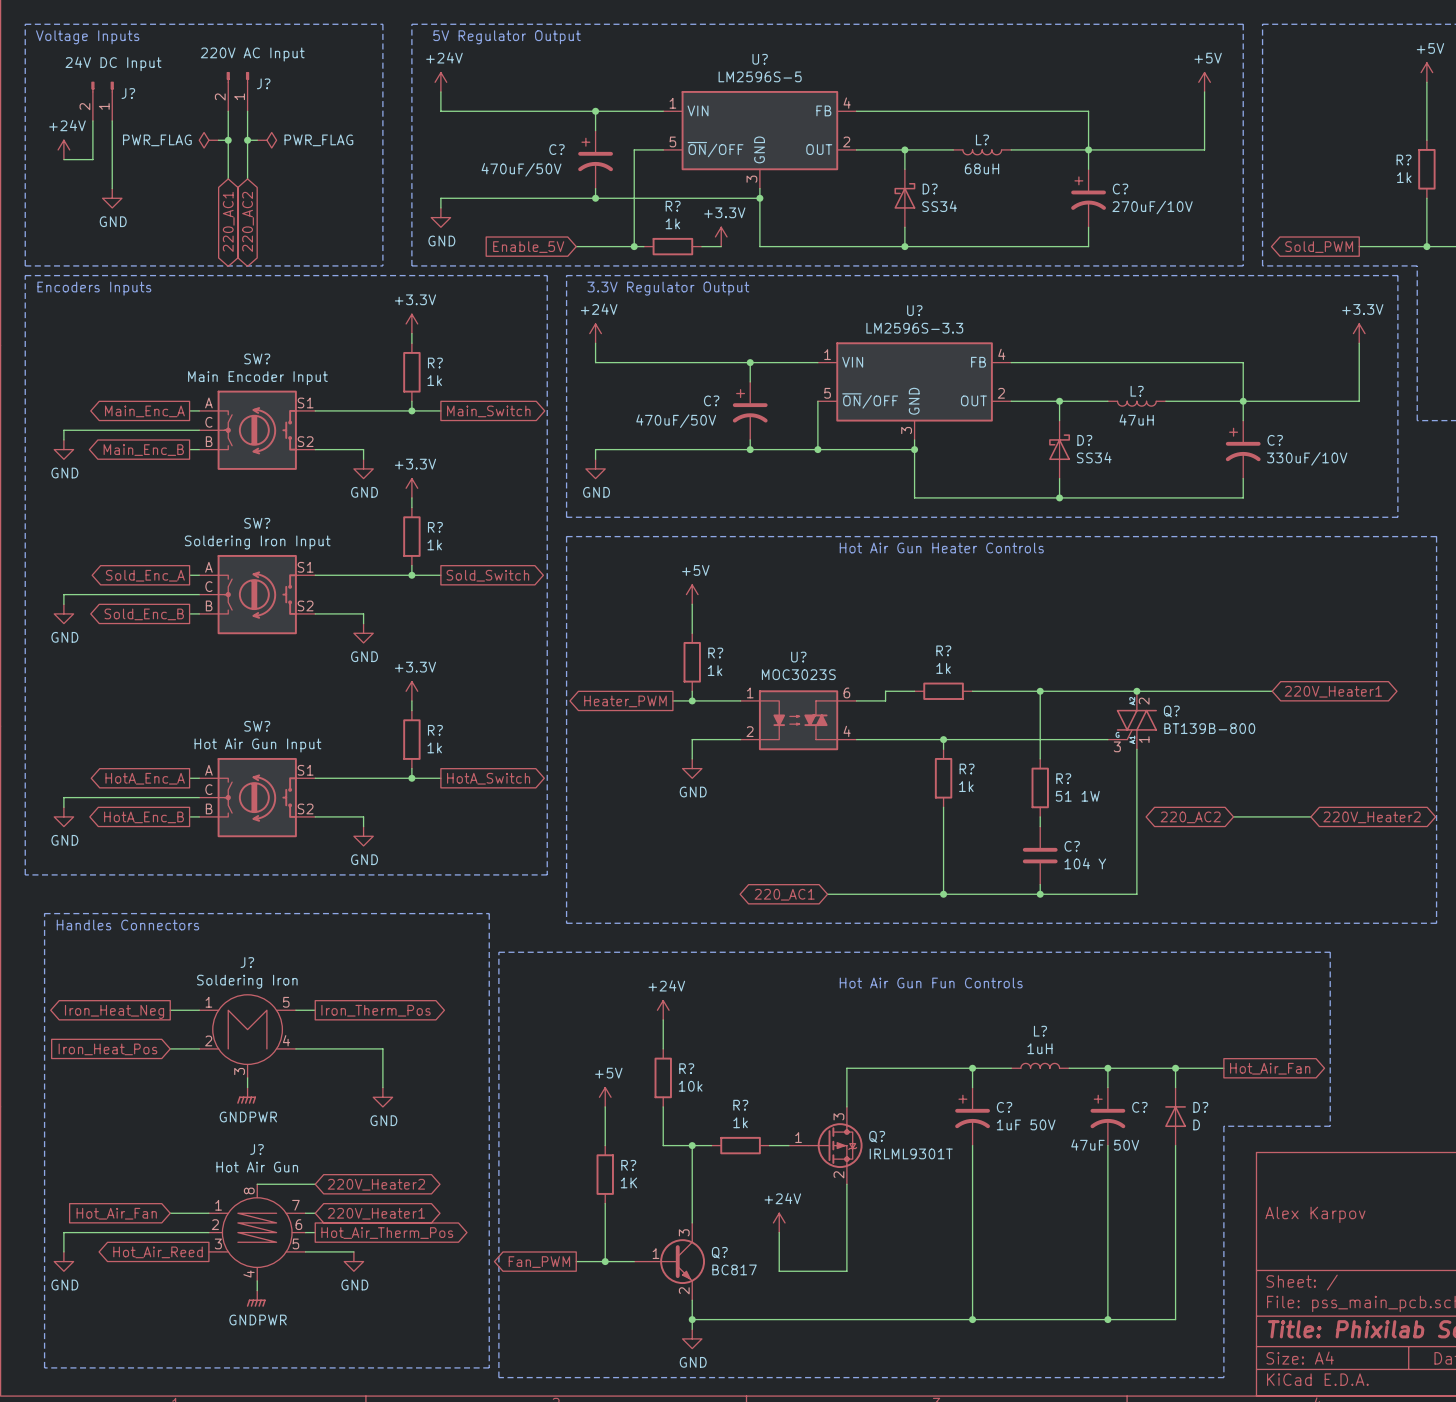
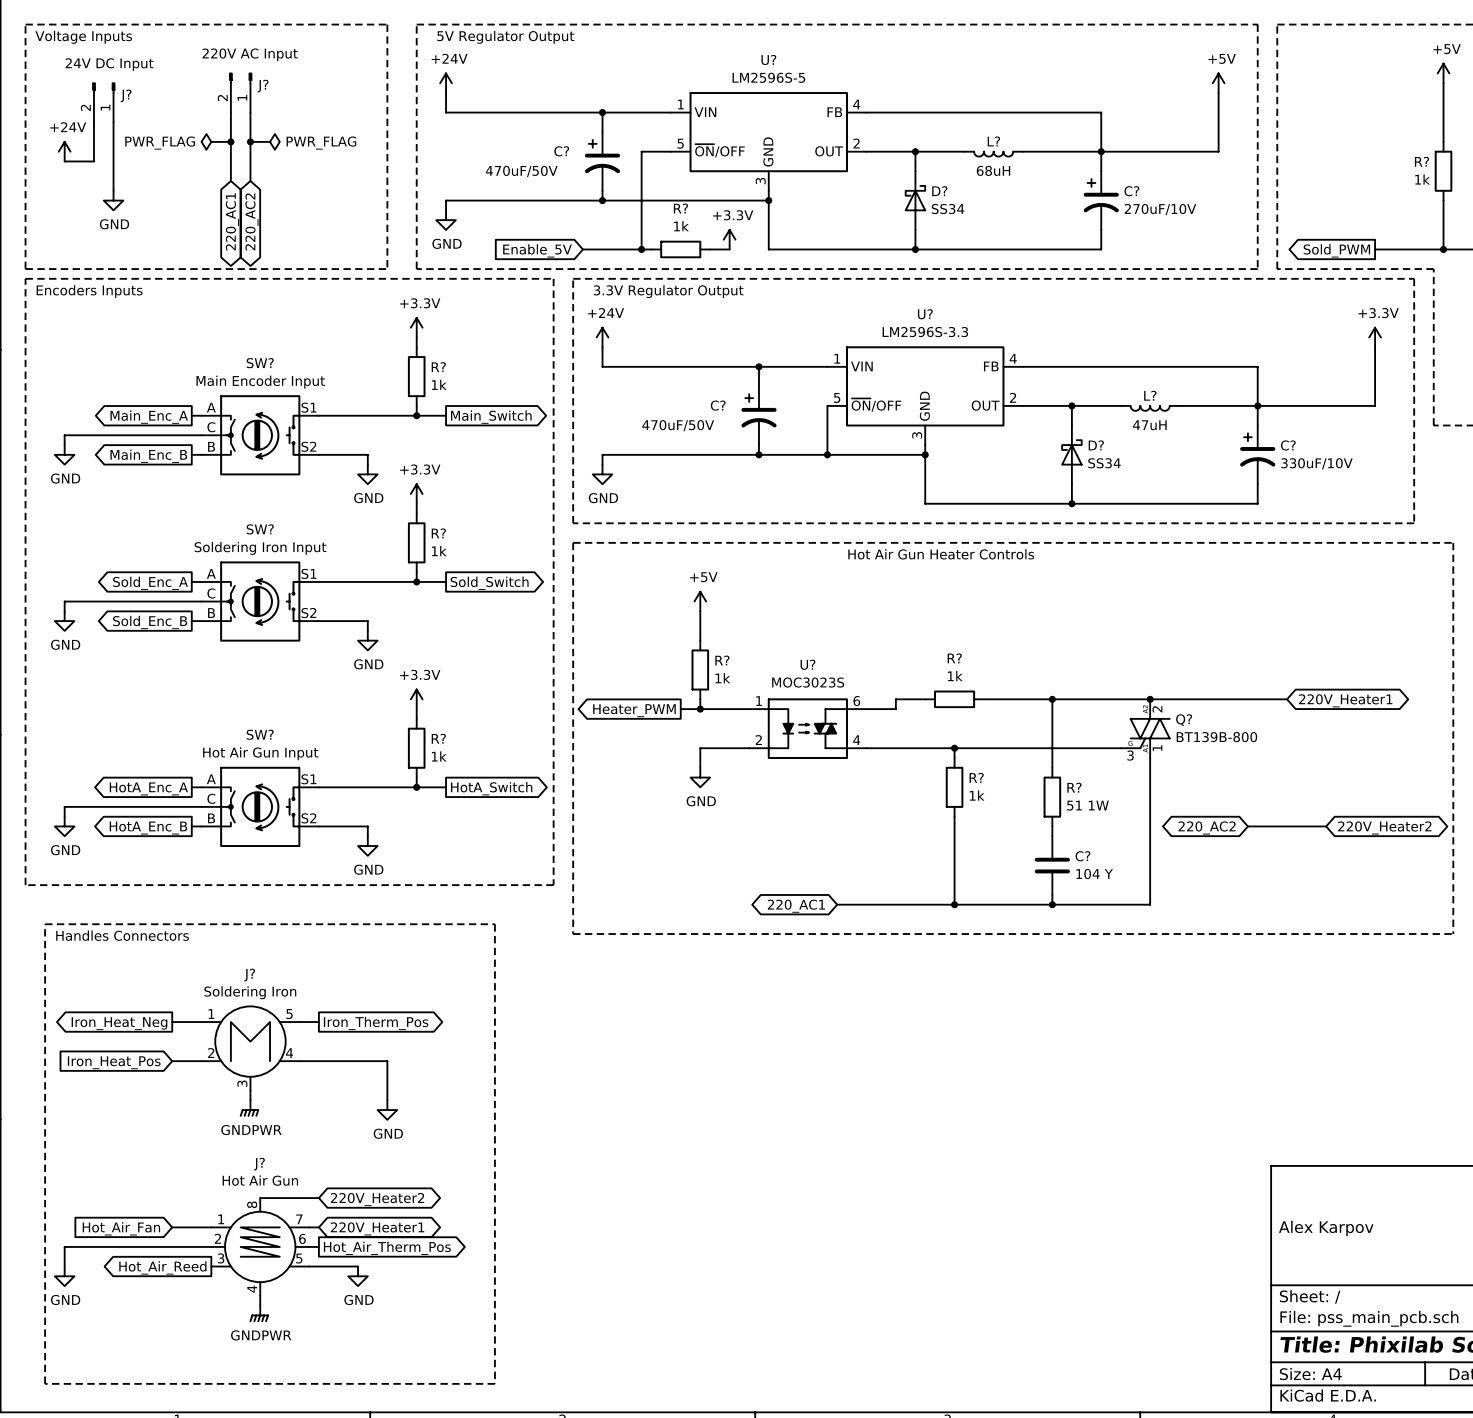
line: (498, 952) (1330, 952) (1330, 1126) (1223, 1126) (1223, 1377) (498, 1377) (498, 952) -> none
text: Hot Air Gun Fun Controls (931, 983) -> none
power symbol: +24V (663, 1010) -> none
wire: (663, 1019) (663, 1048) -> none
L?: 1uH (1040, 1065) -> none
wire: (972, 1068) (972, 1087) -> none
junction: (972, 1068) -> none
wire: (1011, 1068) (846, 1068) (846, 1106) -> none
wire: (1069, 1068) (1223, 1068) -> none
wire: (1107, 1068) (1107, 1087) -> none
junction: (1107, 1068) -> none
wire: (1175, 1068) (1175, 1087) -> none
junction: (1175, 1068) -> none
global label: Hot_Air_Fan (1270, 1068) -> none
R?: 10k (663, 1077) -> none
power symbol: +5V (605, 1097) -> none
wire: (605, 1106) (605, 1145) -> none
wire: (663, 1106) (663, 1145) (711, 1145) -> none
C?: 1uF 50V (972, 1116) -> none
C?: 47uF 50V (1107, 1116) -> none
D?: D (1175, 1116) -> none
wire: (692, 1145) (692, 1222) -> none
junction: (692, 1145) -> none
R?: 1k (740, 1145) -> none
wire: (769, 1145) (788, 1145) -> none
Q?: IRLML9301T (825, 1145) -> none
wire: (972, 1145) (972, 1319) -> none
wire: (1107, 1145) (1107, 1319) -> none
wire: (1175, 1145) (1175, 1319) (692, 1319) -> none
R?: 1K (605, 1174) -> none
wire: (846, 1184) (846, 1271) (779, 1271) (779, 1232) -> none
wire: (605, 1203) (605, 1261) -> none
power symbol: +24V (779, 1222) -> none
wire: (576, 1261) (634, 1261) -> none
junction: (605, 1261) -> none
Q?: BC817 (669, 1261) -> none
global label: Fan_PWM (539, 1262) -> none
wire: (692, 1300) (692, 1329) -> none
junction: (692, 1319) -> none
junction: (972, 1319) -> none
junction: (1107, 1319) -> none
power symbol: GND (692, 1338) -> none

